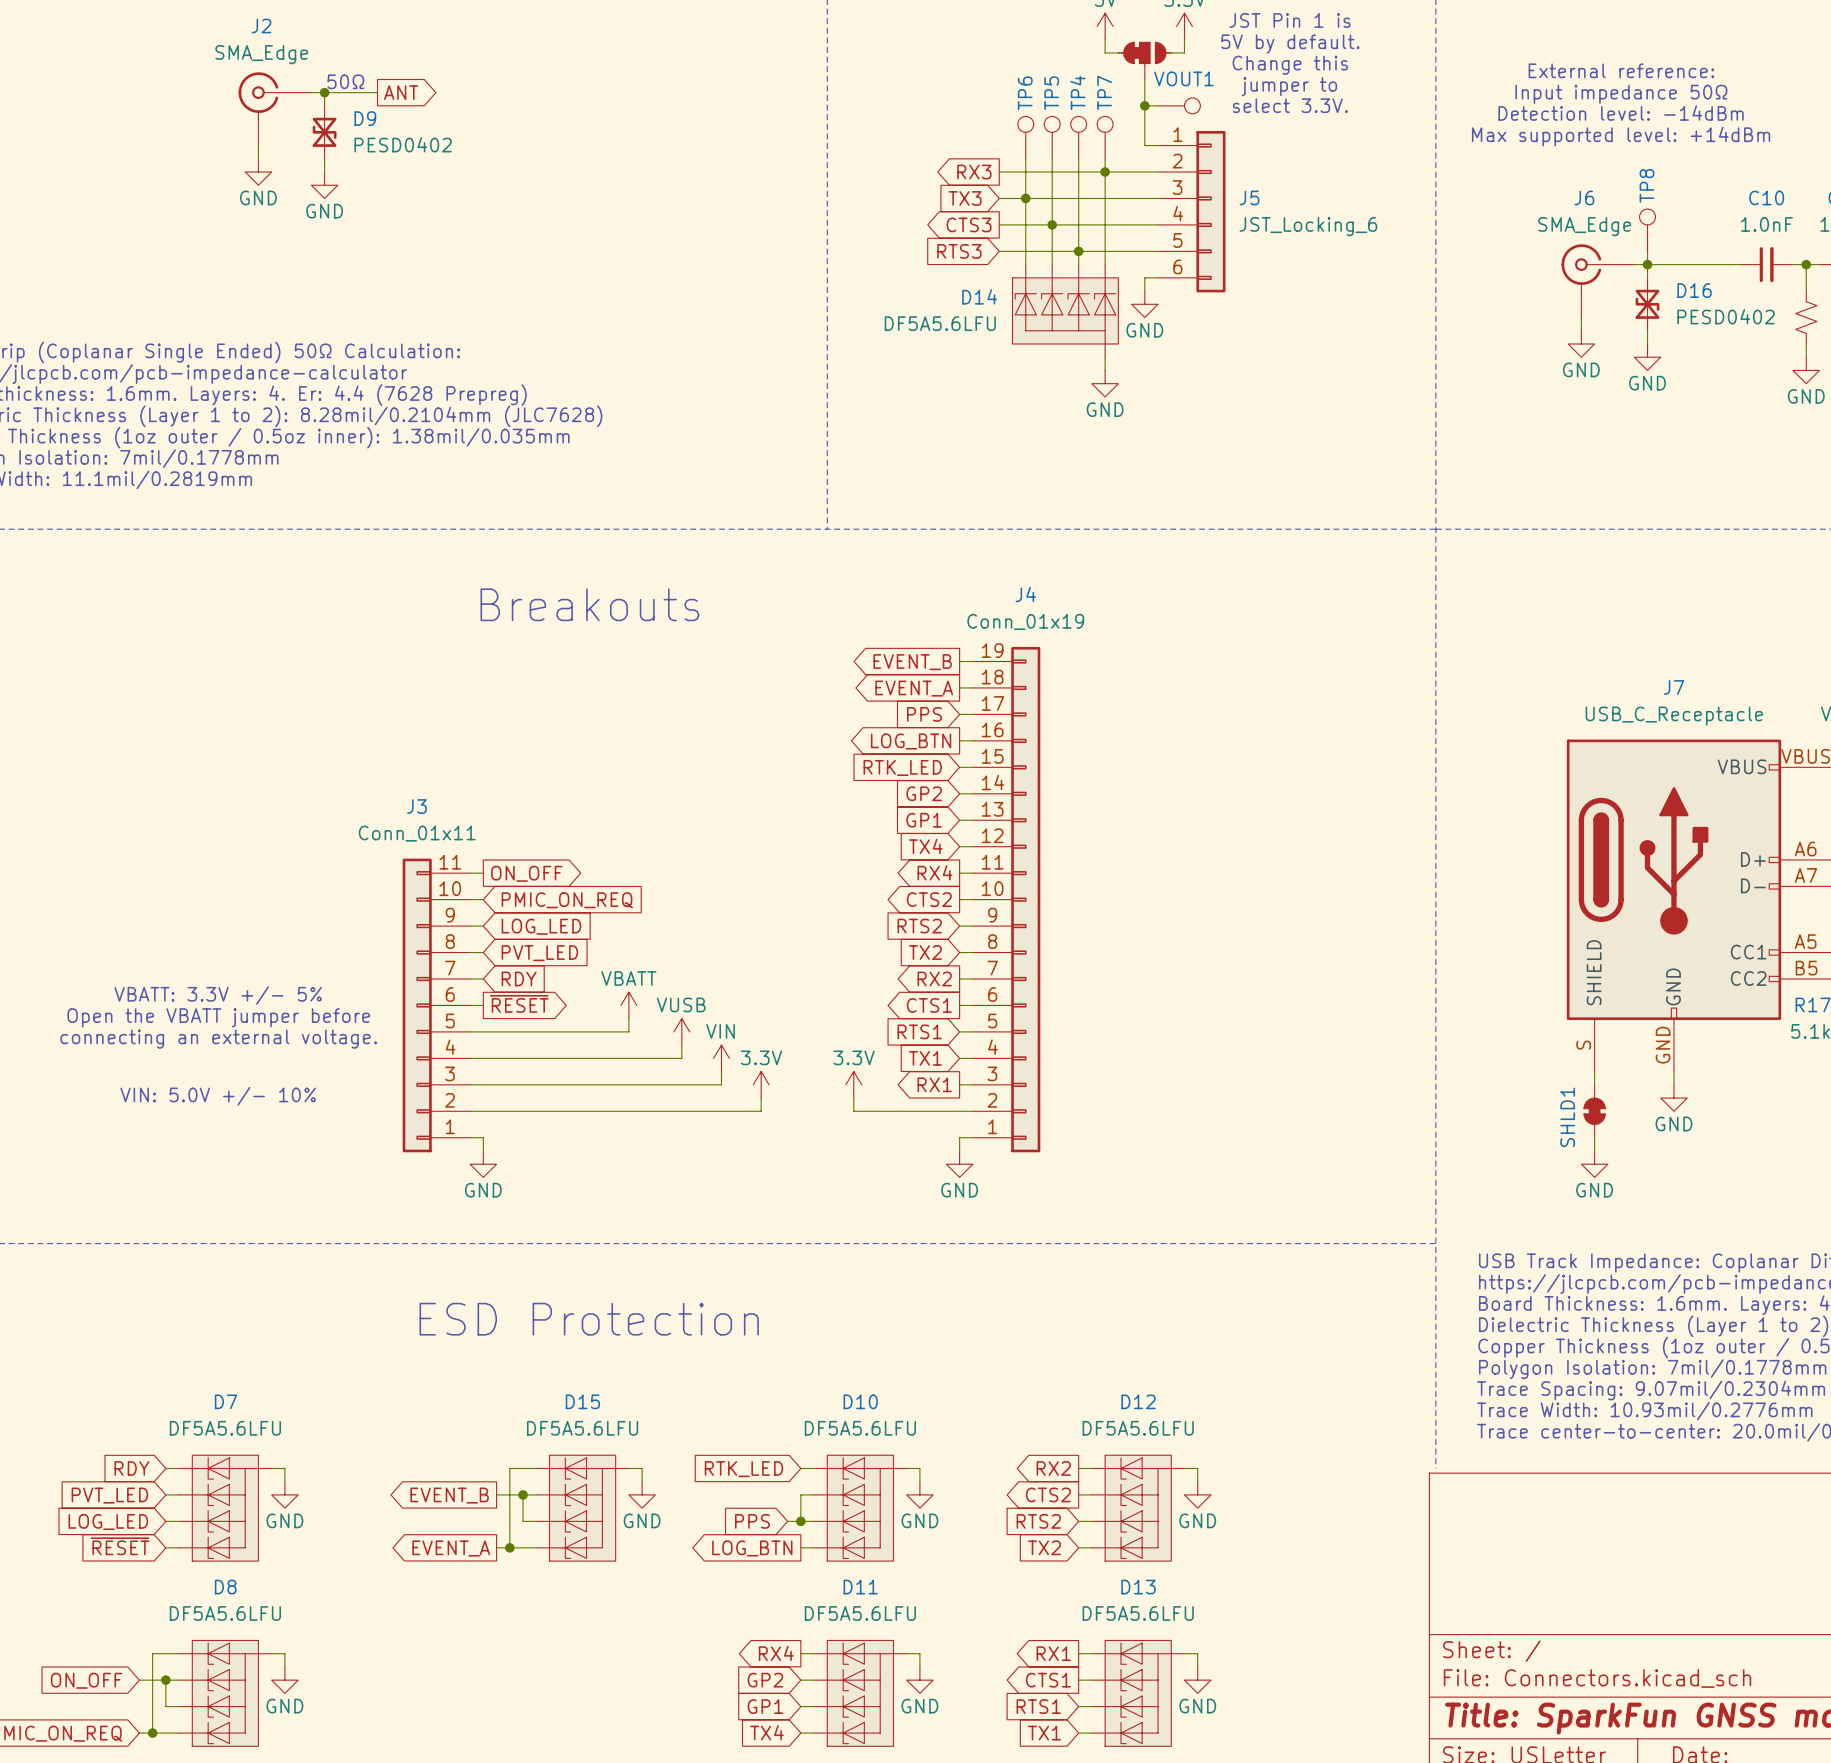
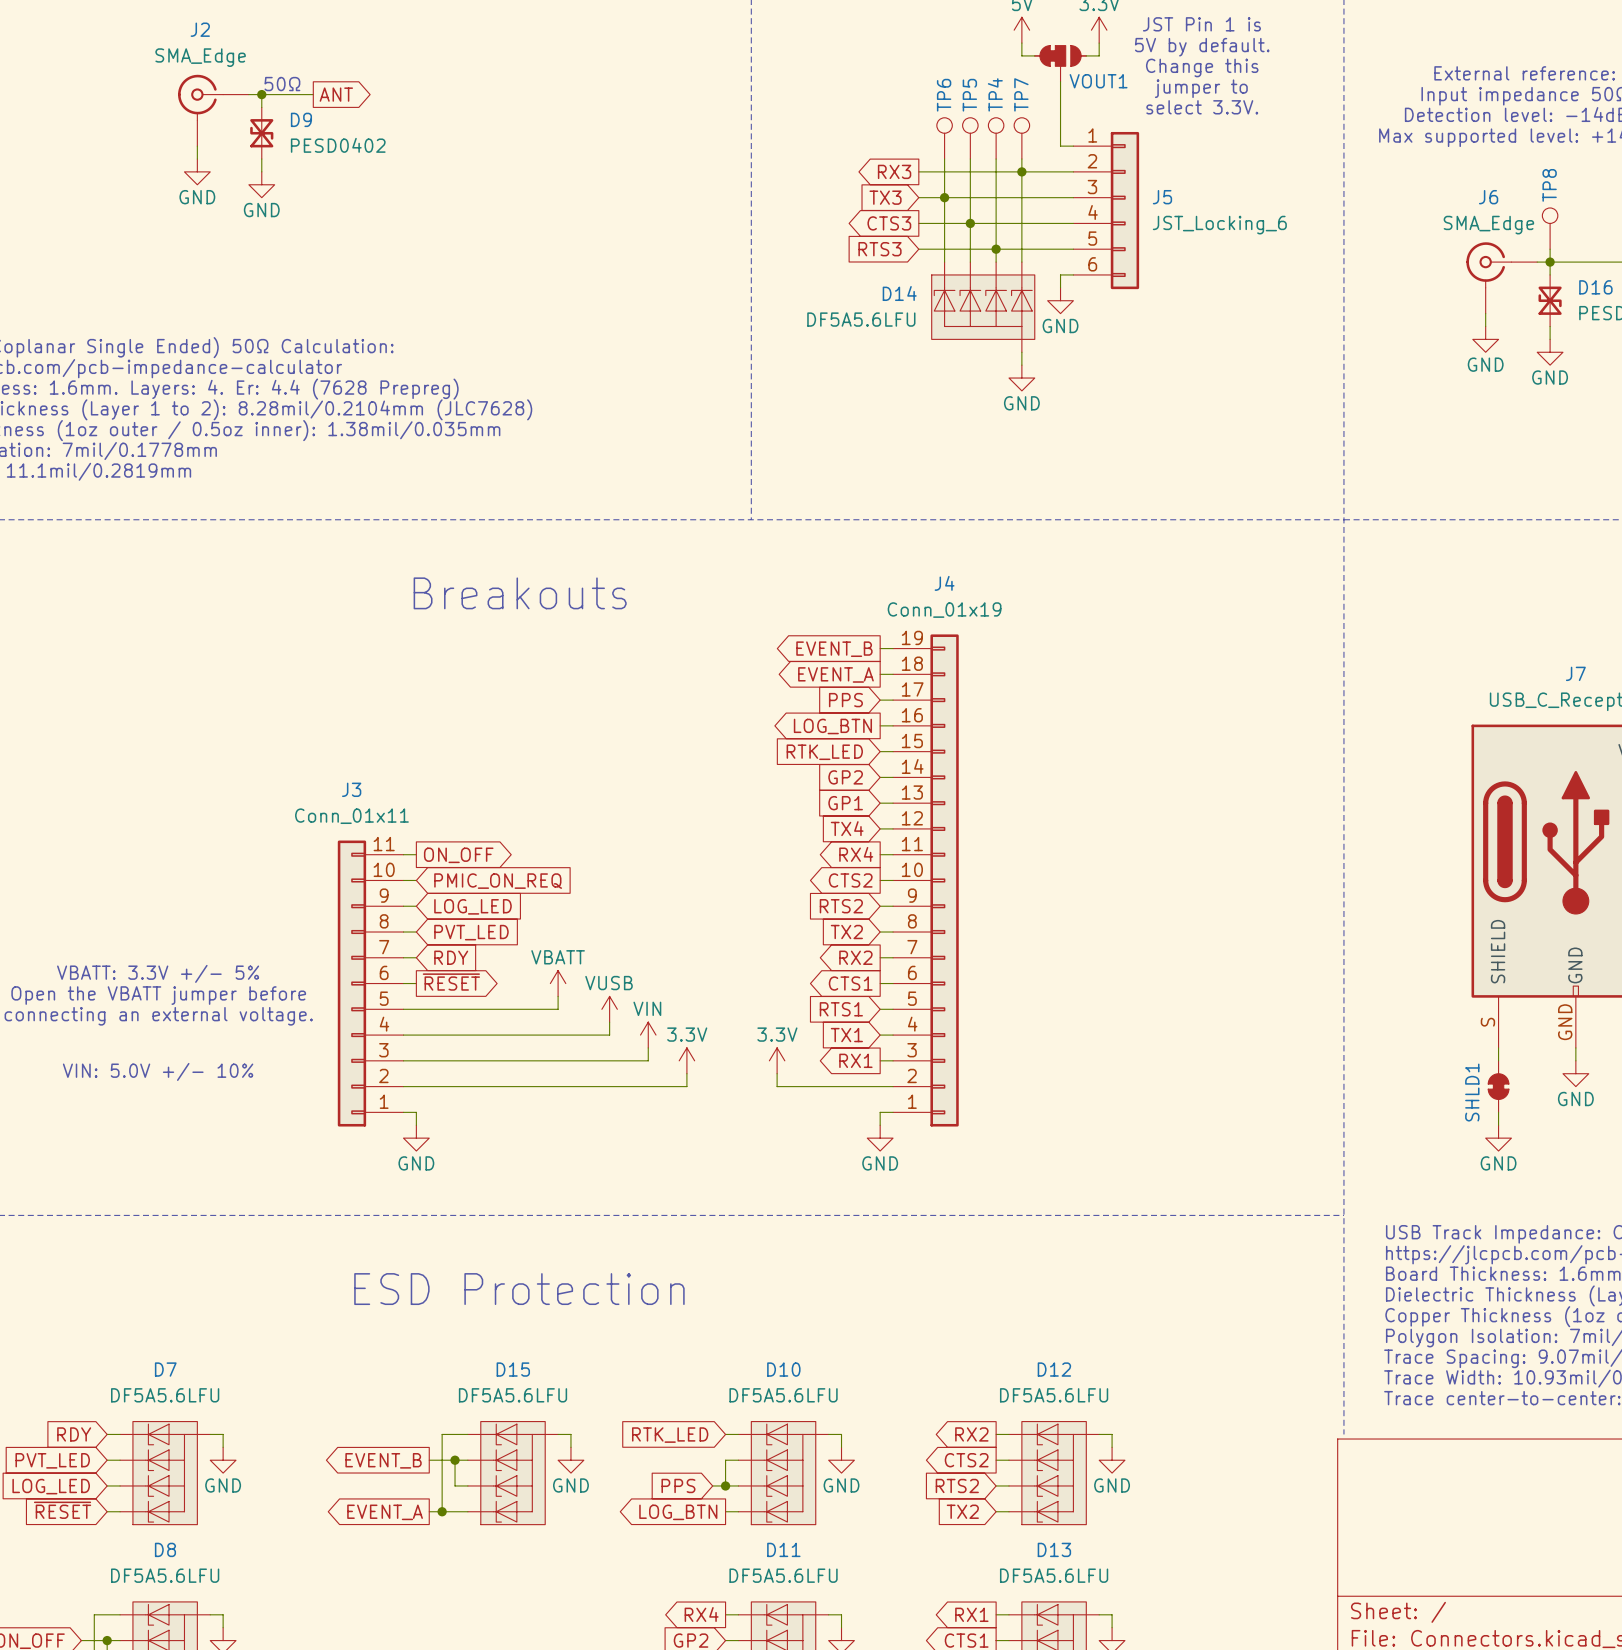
wire: (1144, 105) (1158, 105) -> none
junction: (1144, 105) -> none
part: (1179, 105) -> none

